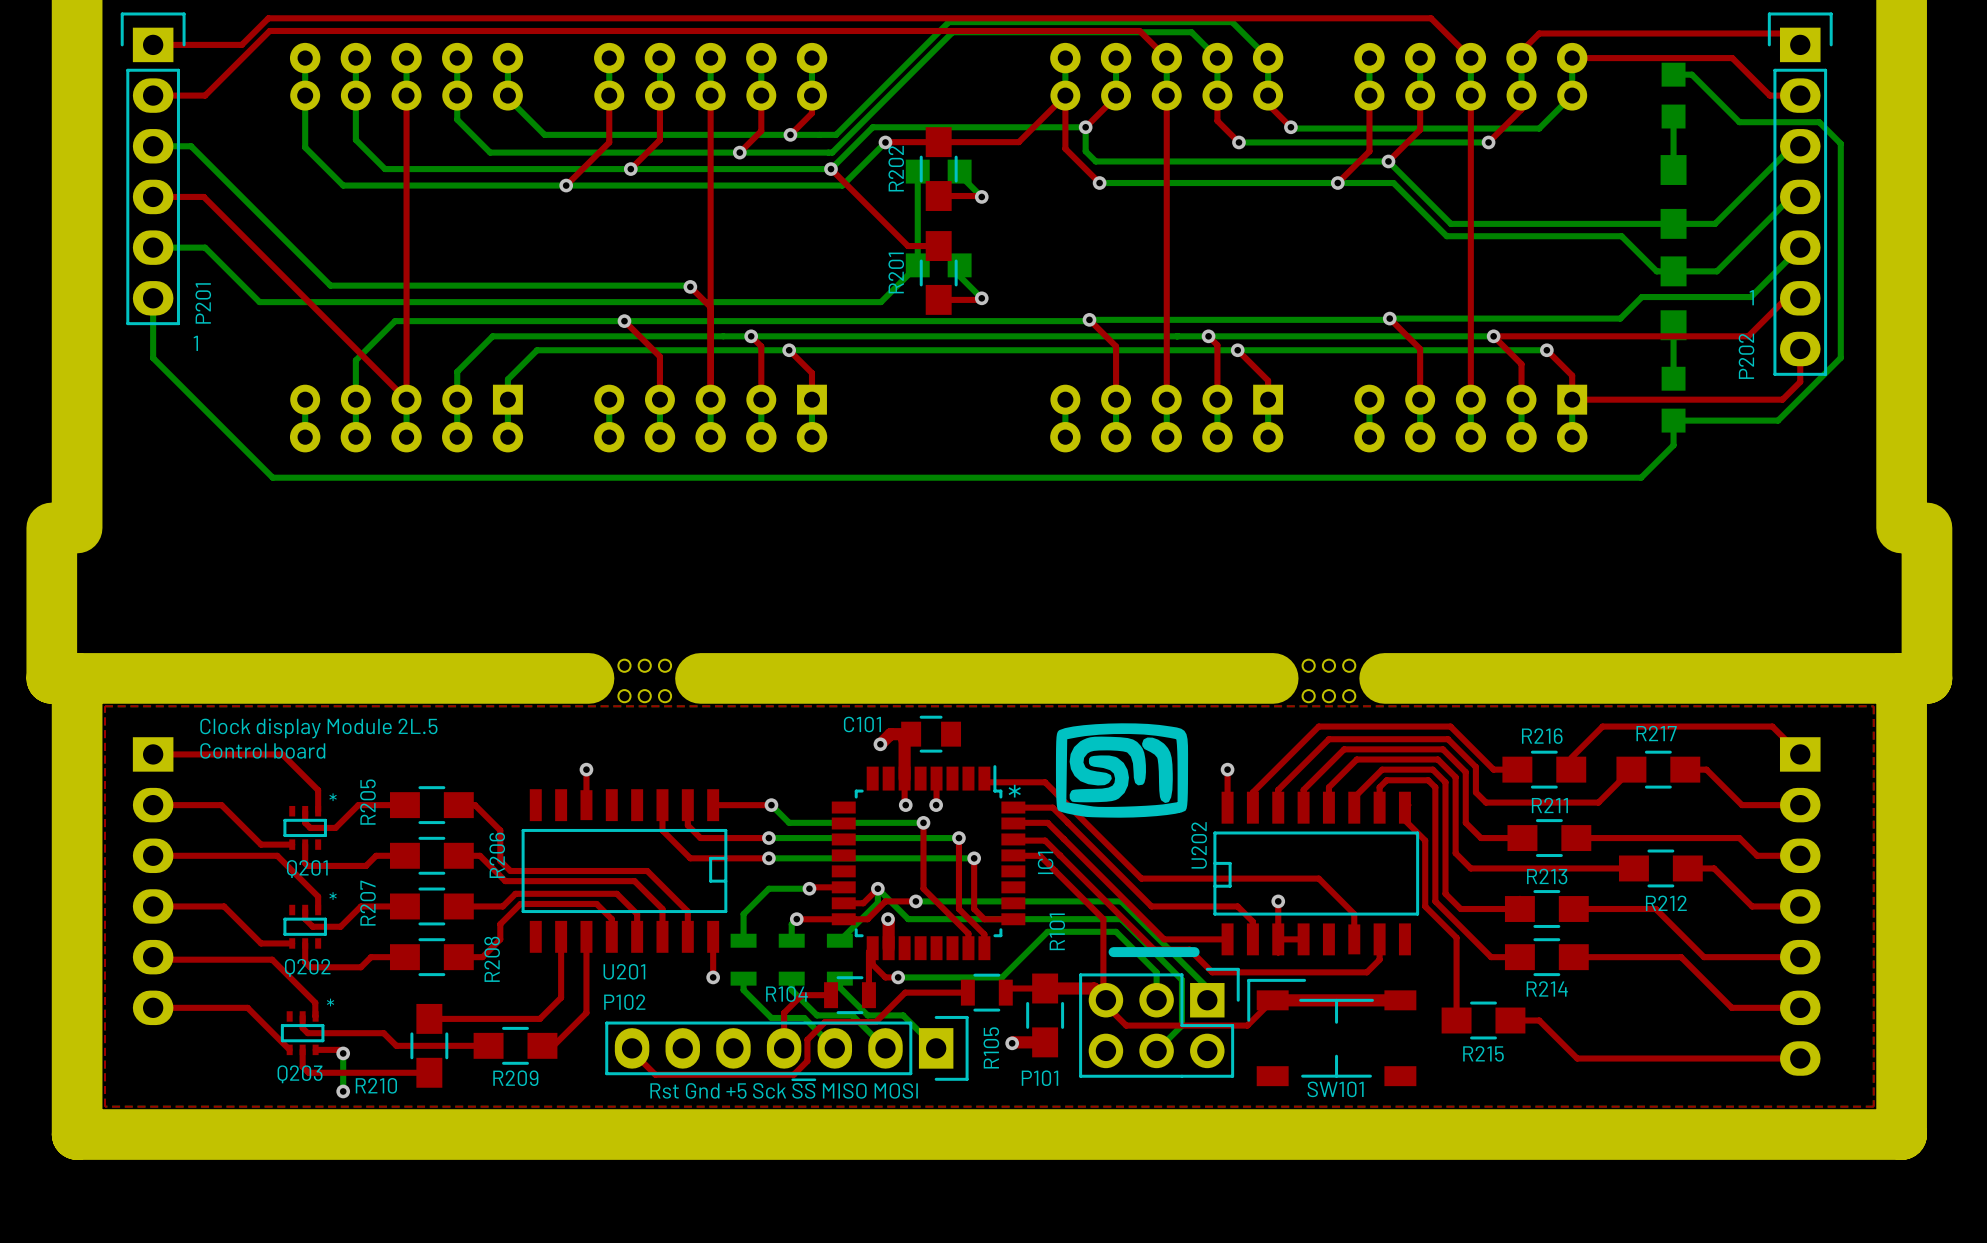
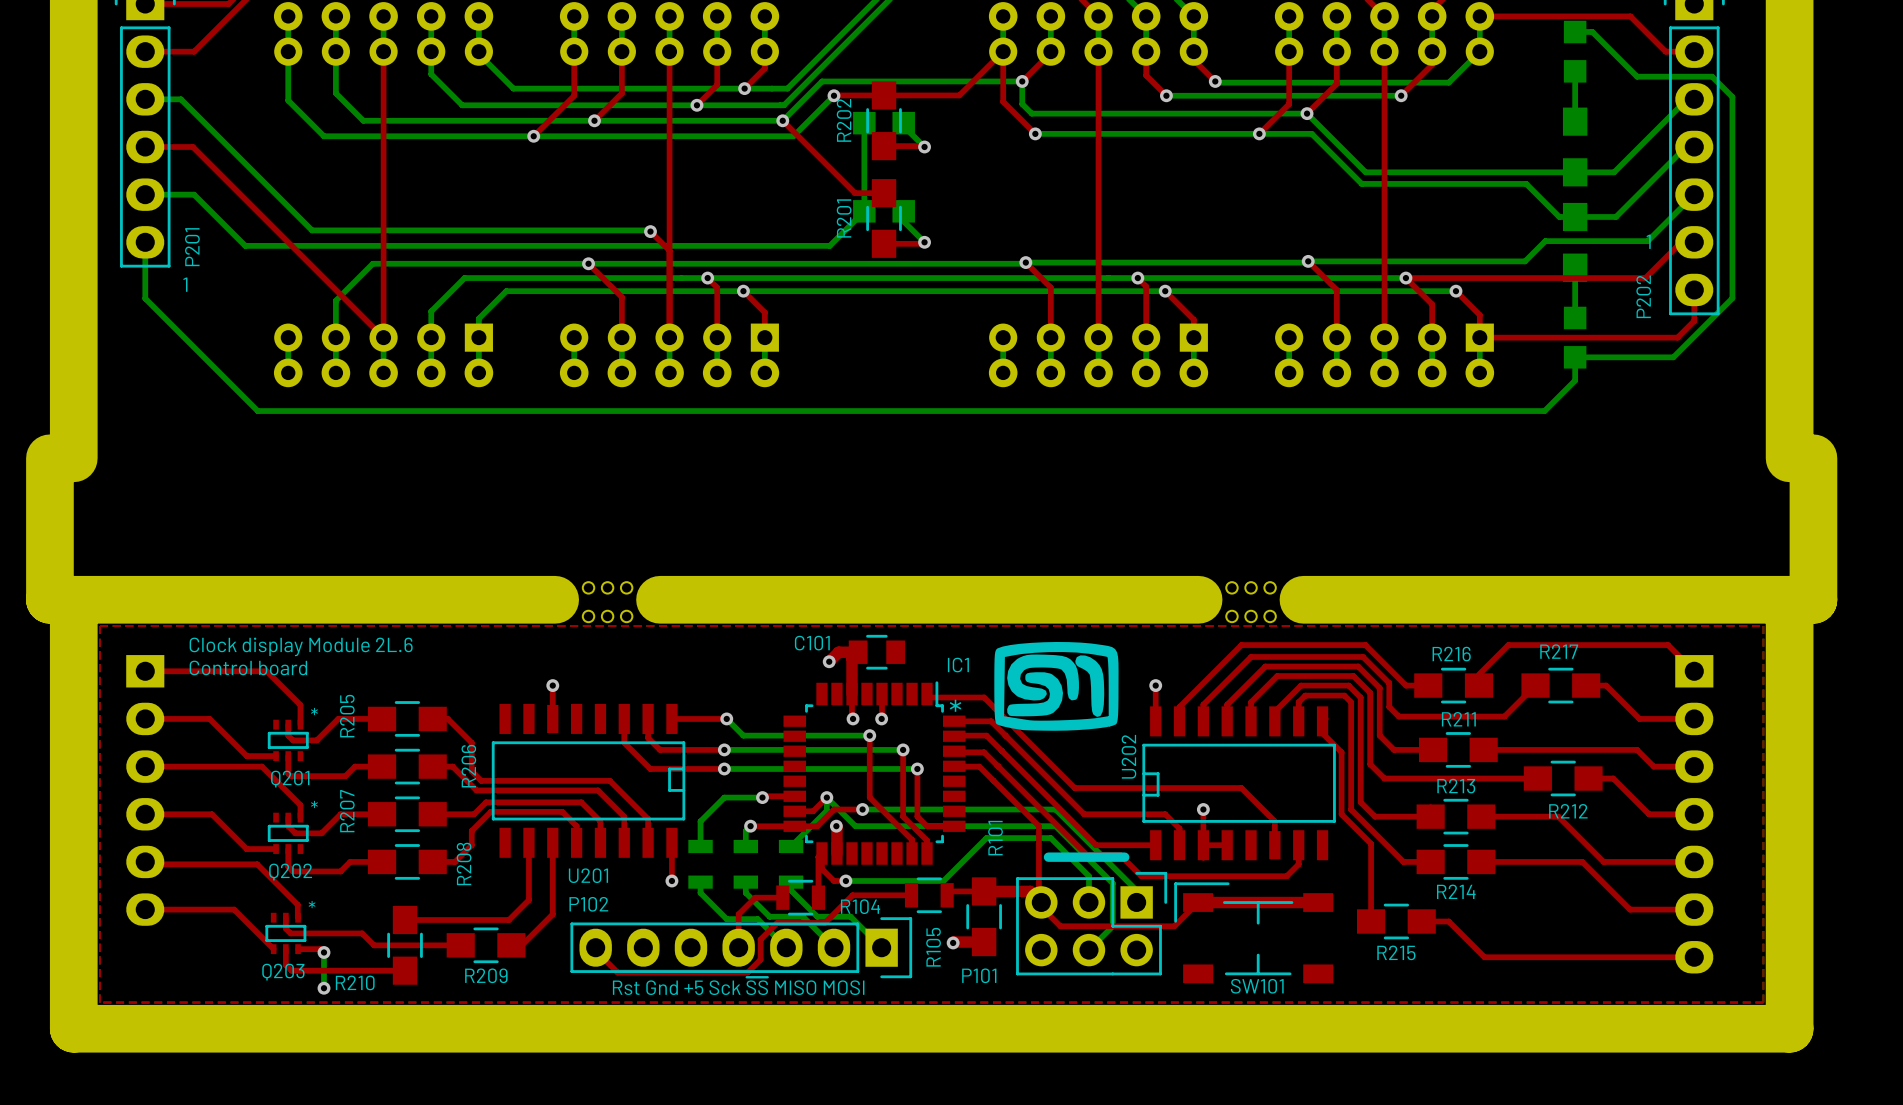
text: Clock display Module 2L.5 (318, 728) -> Clock display Module 2L.6 (301, 646)
IC1 name rotation: 0° (1045, 862) -> 90° clockwise (958, 665)
IC1 name position: IC1 (1045, 862) -> IC1 (958, 665)
R104 name position: R104 (787, 994) -> R104 (860, 906)

